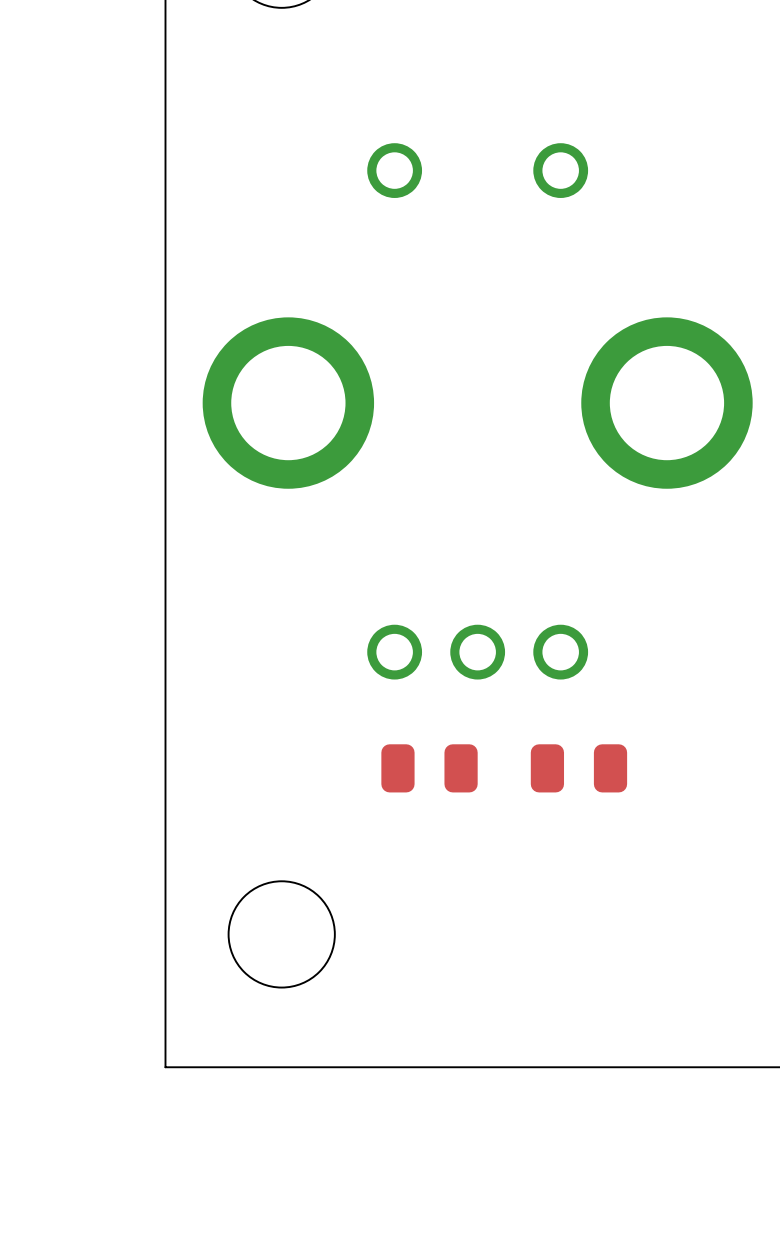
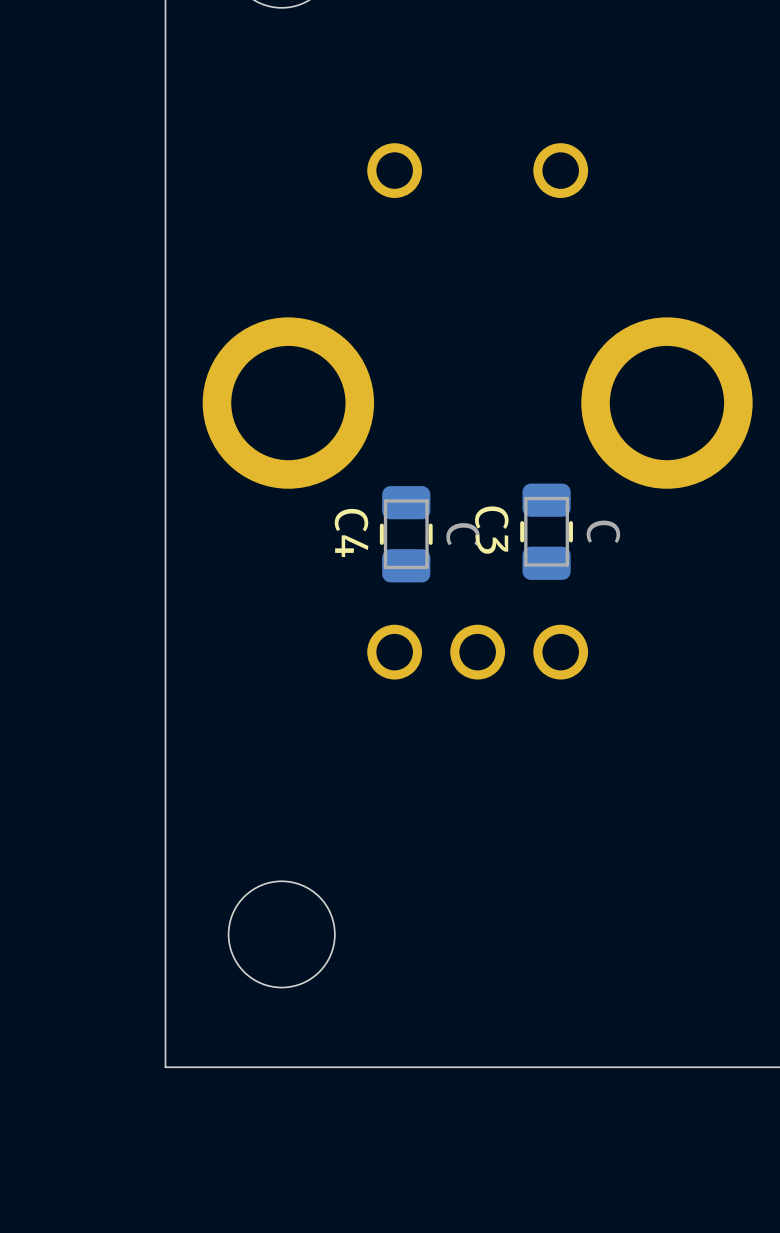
C4 side: top (429, 768) -> bottom (406, 534)
C3 side: top (578, 768) -> bottom (546, 531)

